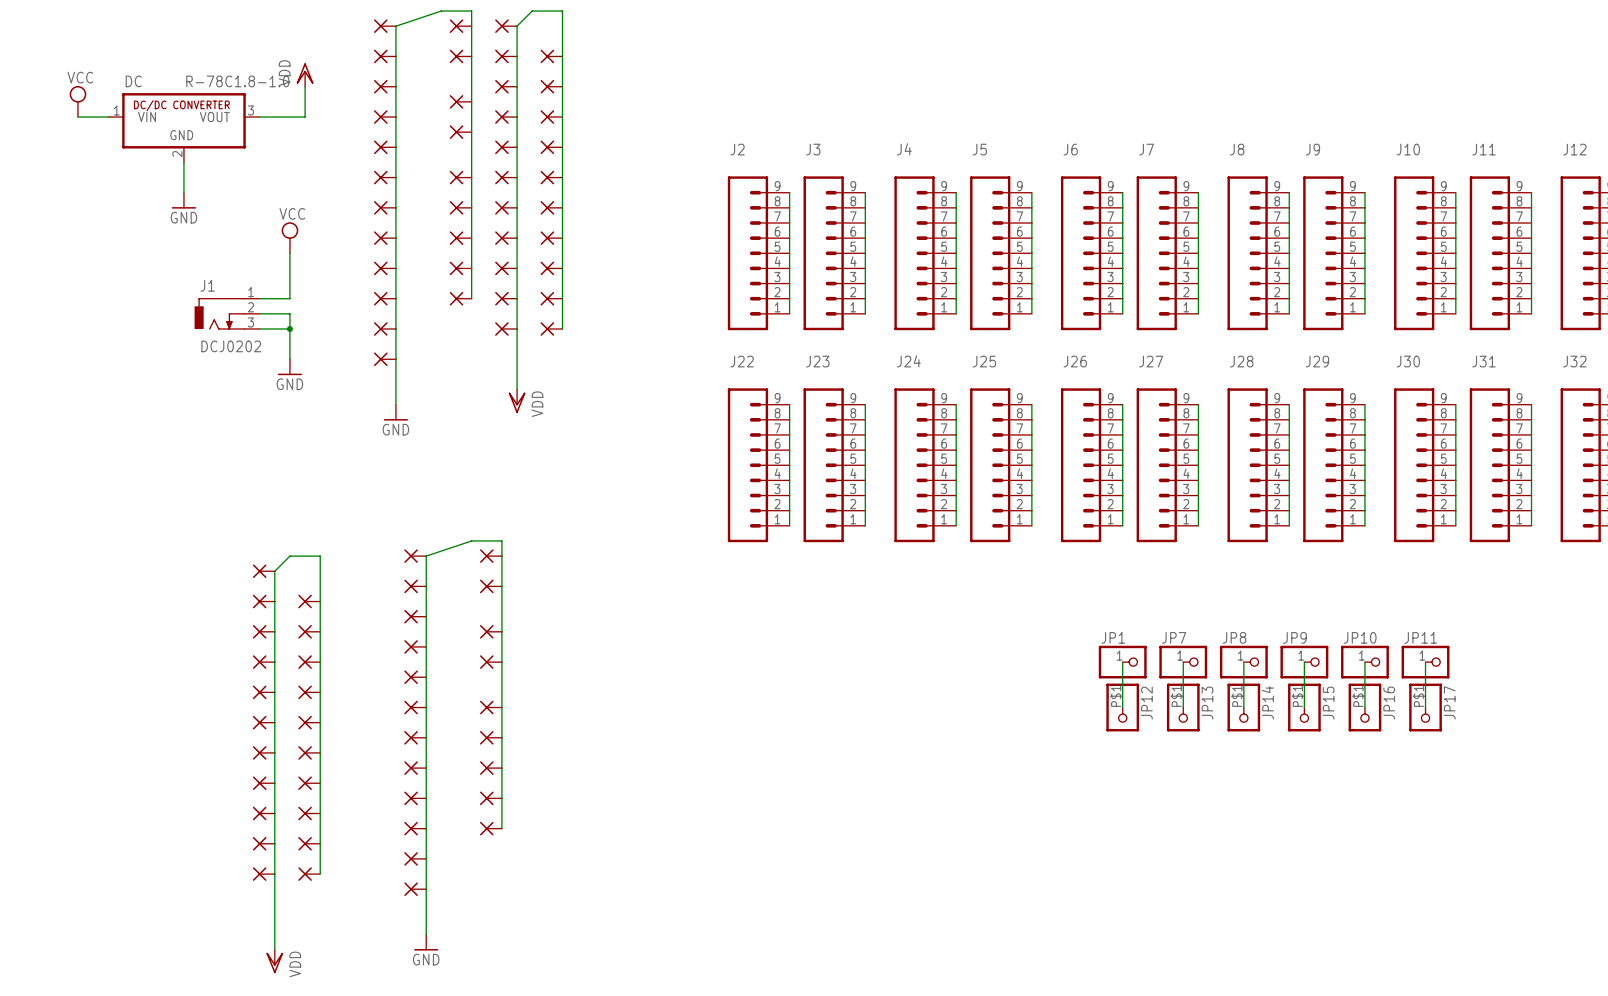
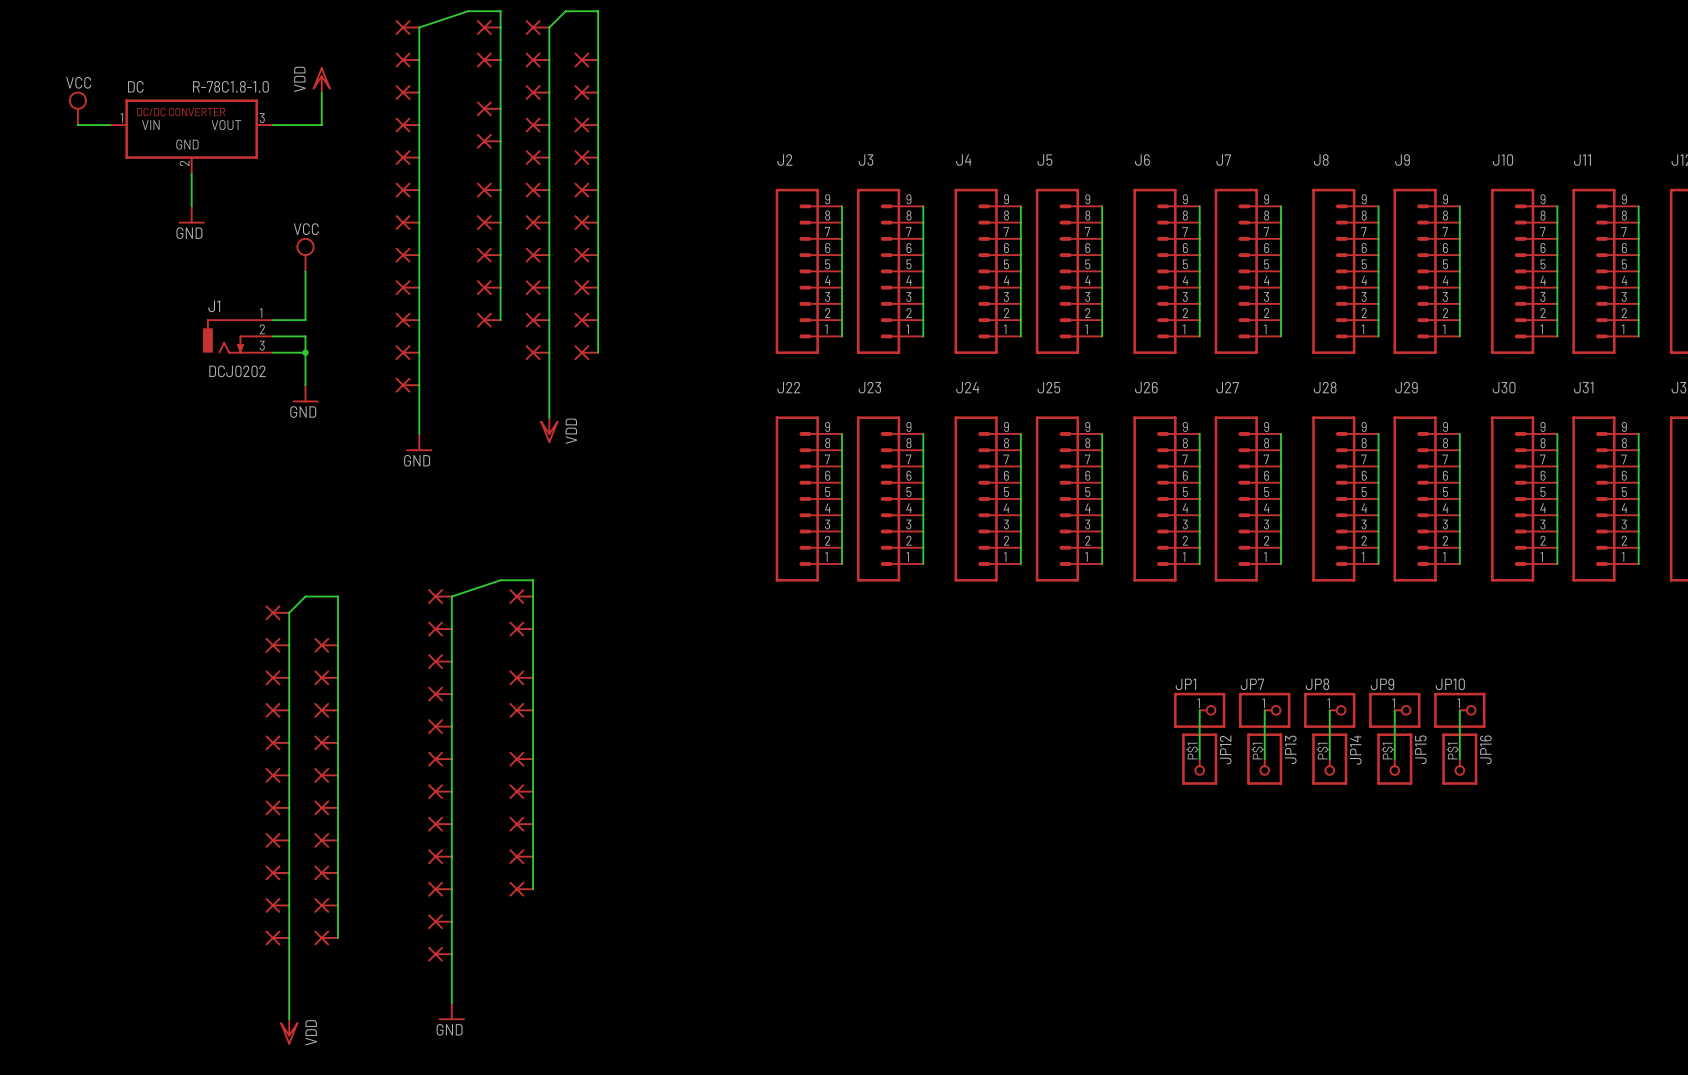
wire: (1425, 662) (1425, 707) -> none
JP11: (1425, 662) -> none
JP17: (1425, 707) -> none

